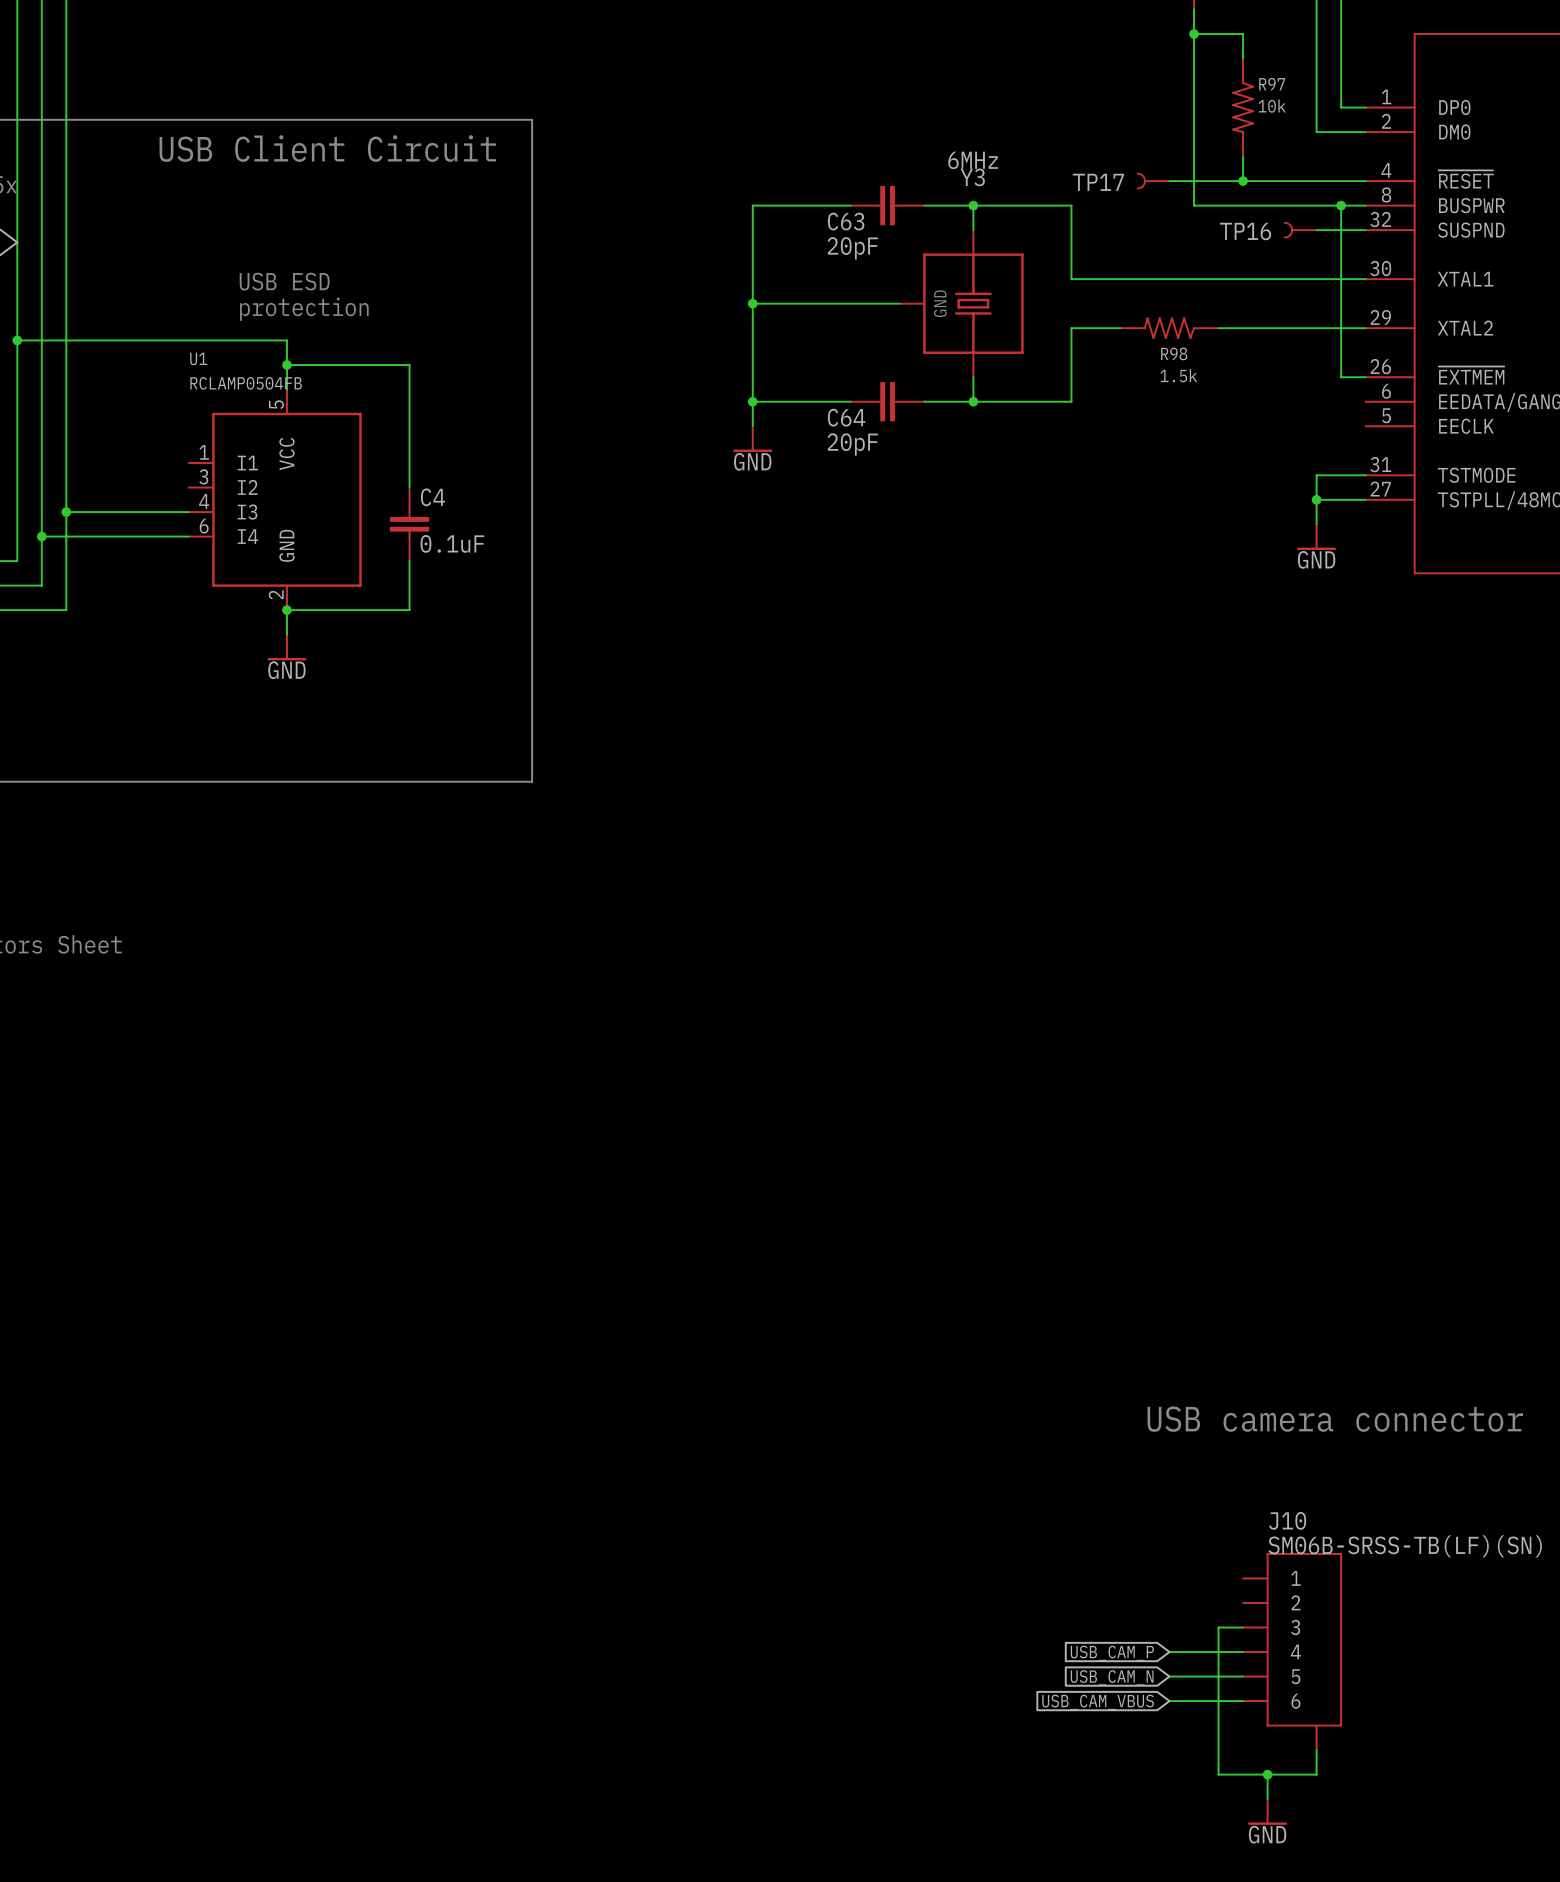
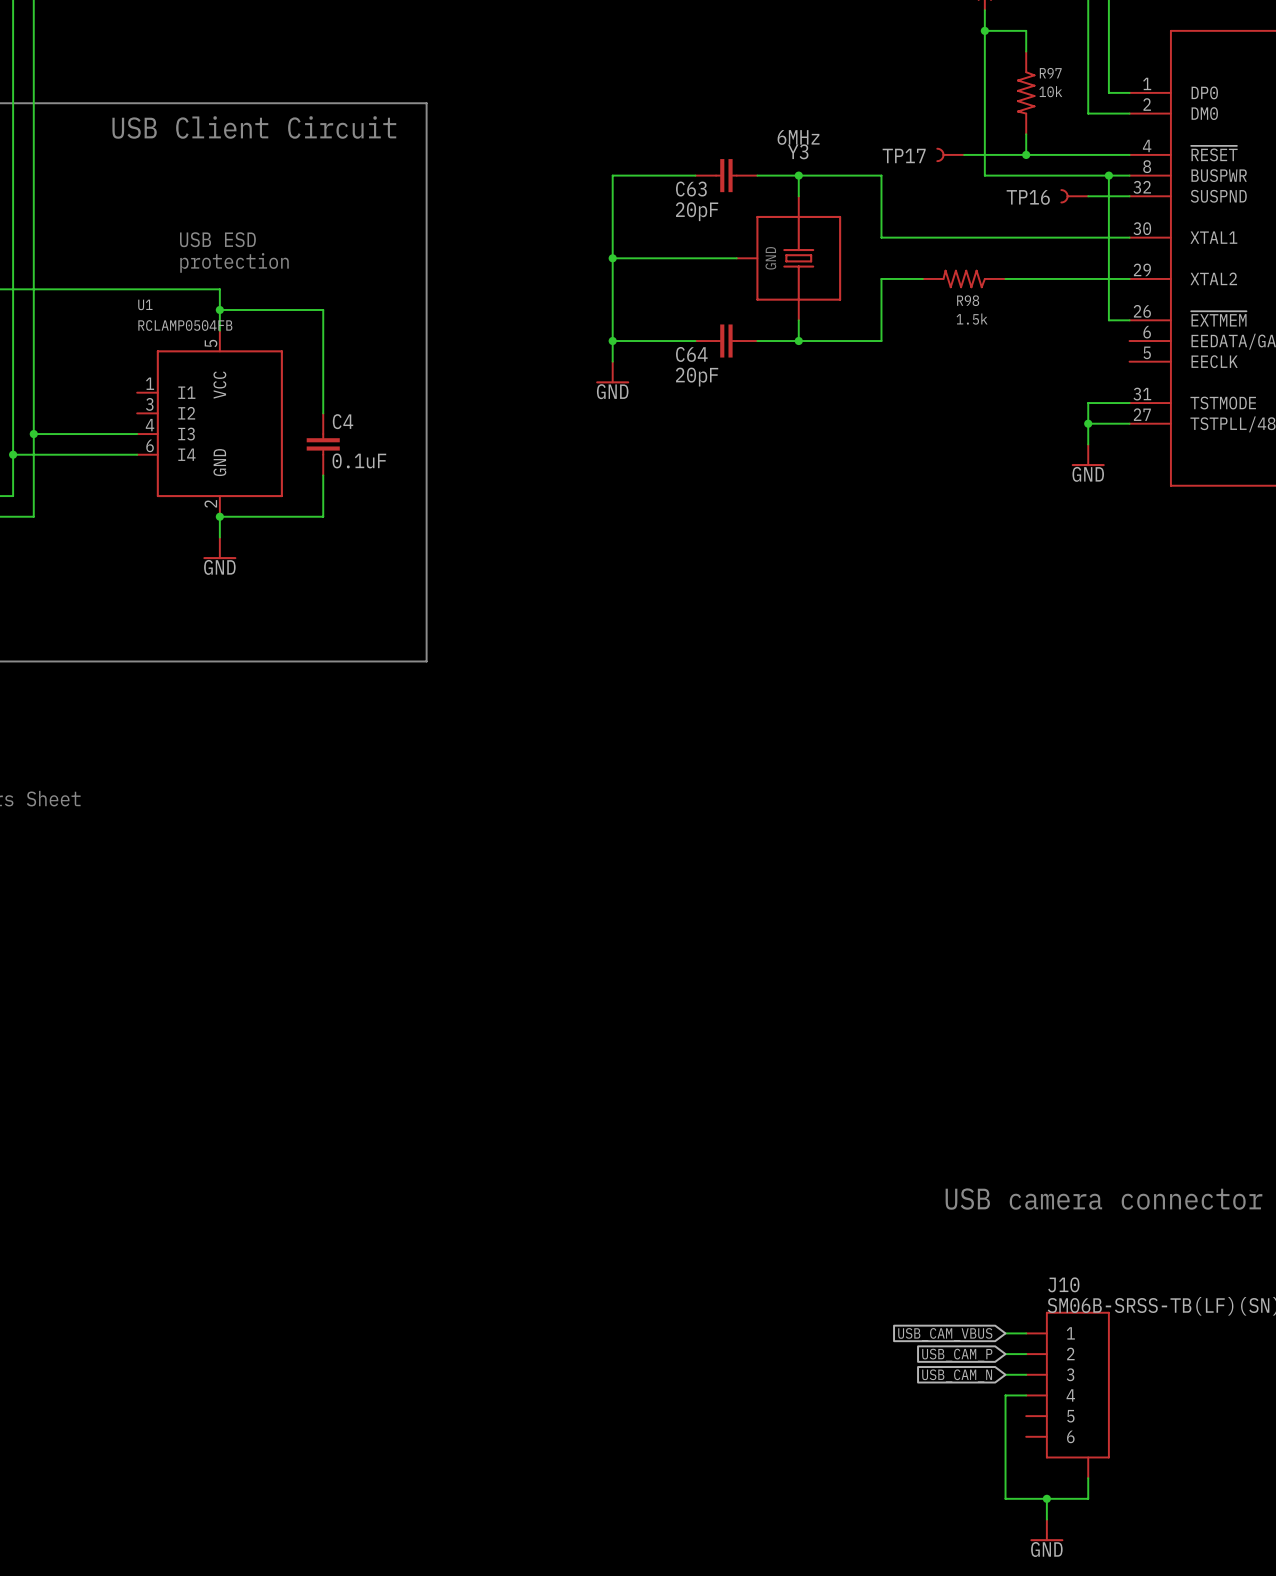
wire: none -> (1005, 1333) (1026, 1333)
wire: none -> (1005, 1354) (1026, 1354)
wire: (1218, 1627) (1218, 1652) (1169, 1652) -> none
global label position: USB_CAM_P (1112, 1653) -> USB_CAM_P (957, 1355)
wire: (1169, 1676) (1243, 1676) -> none
global label position: USB_CAM_N (1112, 1677) -> USB_CAM_N (957, 1375)
wire: (1169, 1701) (1243, 1701) -> none
global label position: USB_CAM_VBUS (1098, 1702) -> USB_CAM_VBUS (945, 1334)

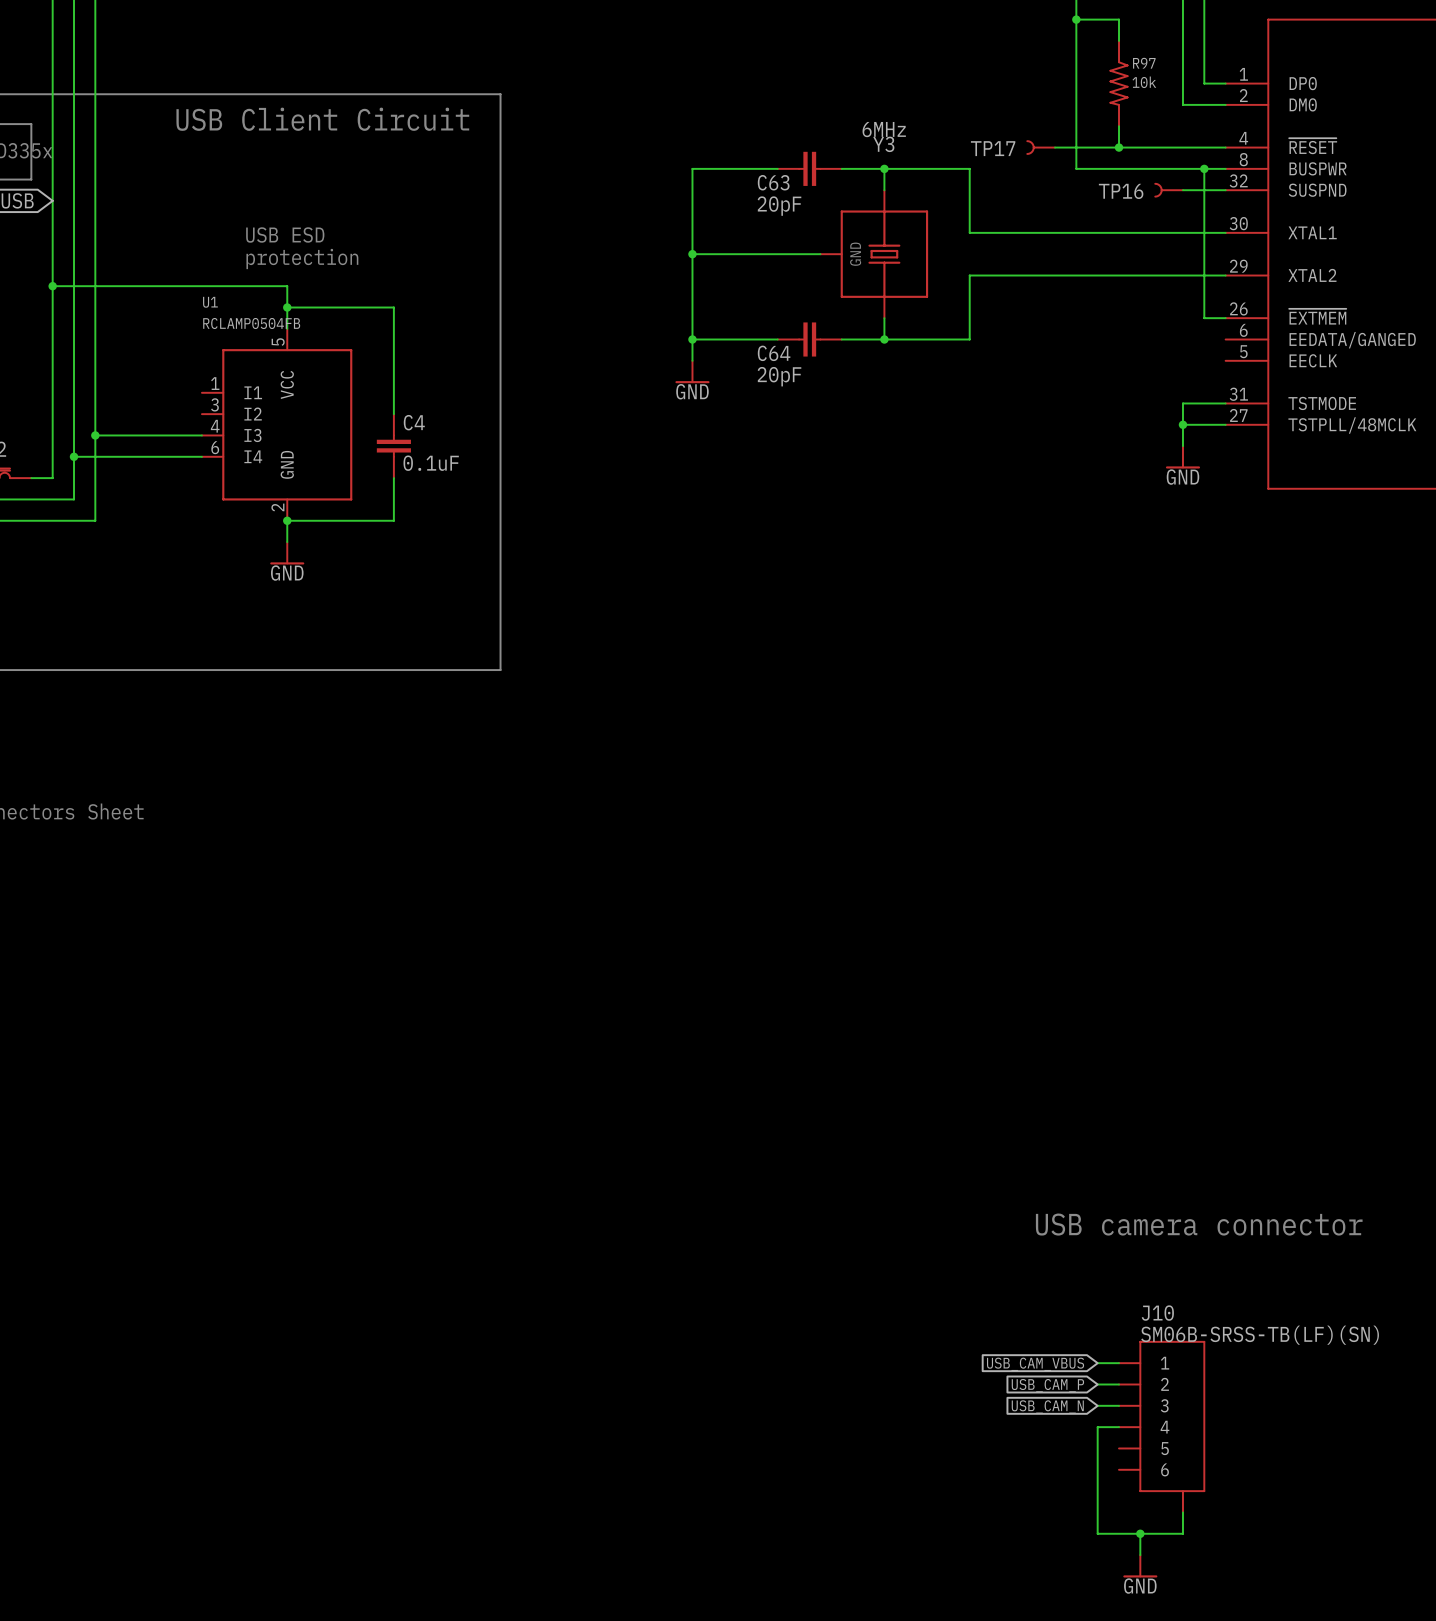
R98: 1.5k (964, 278) -> none

